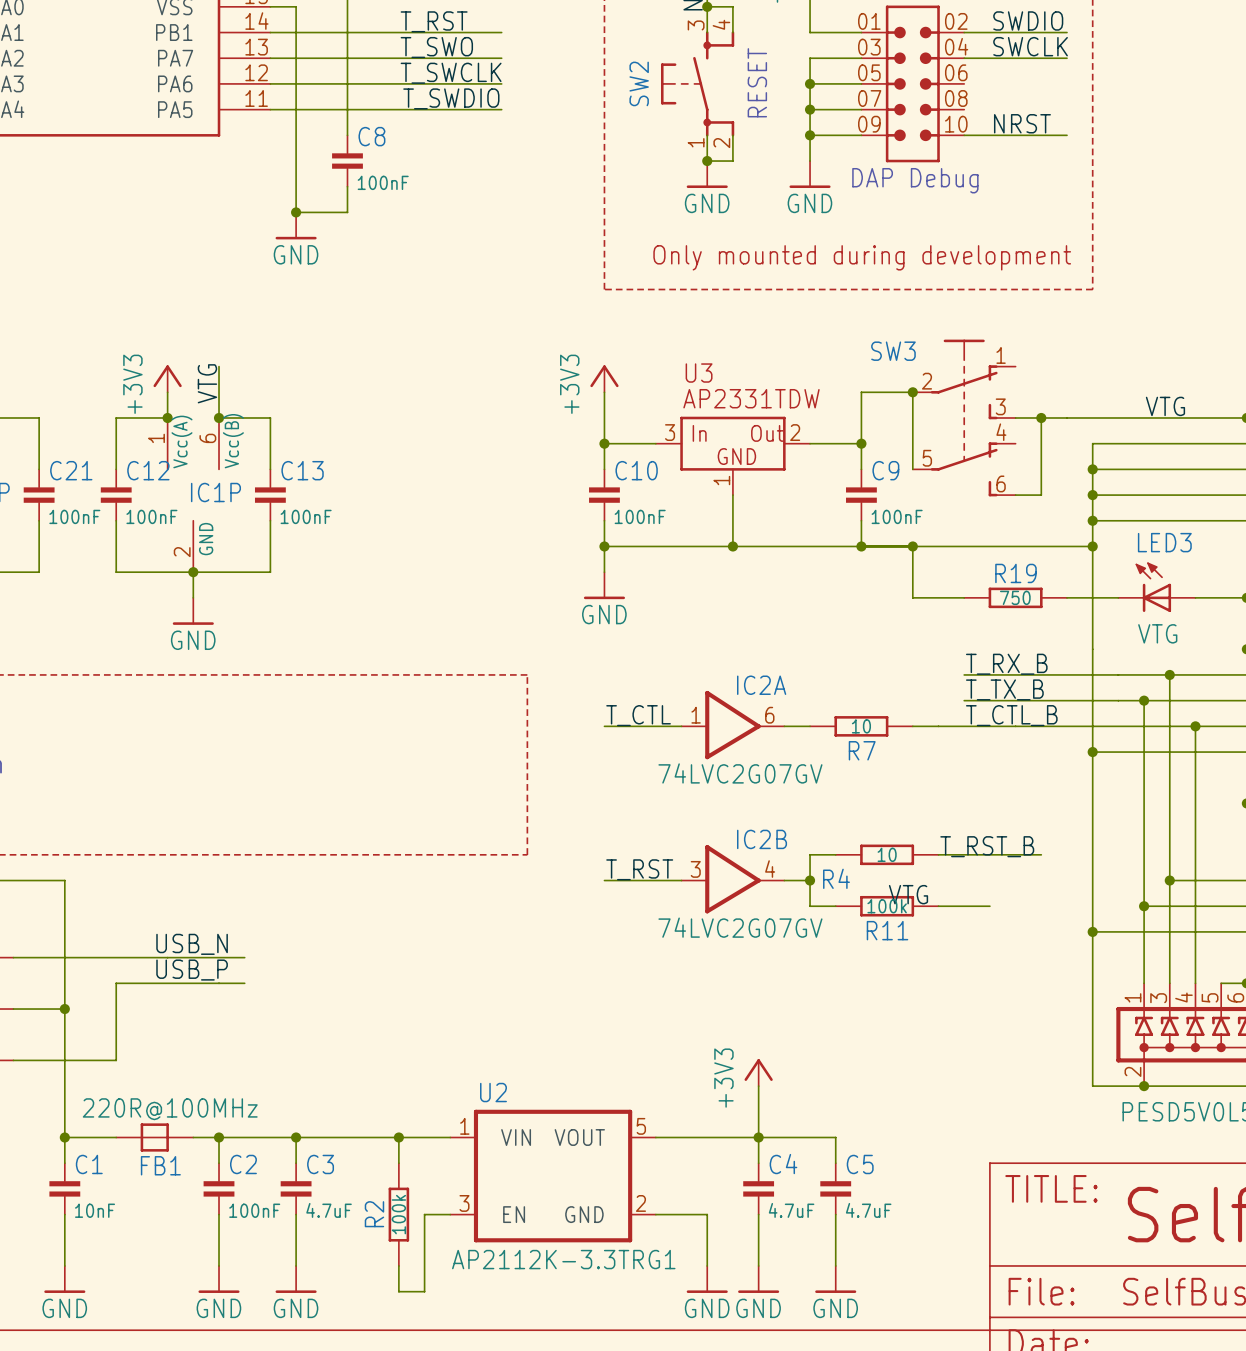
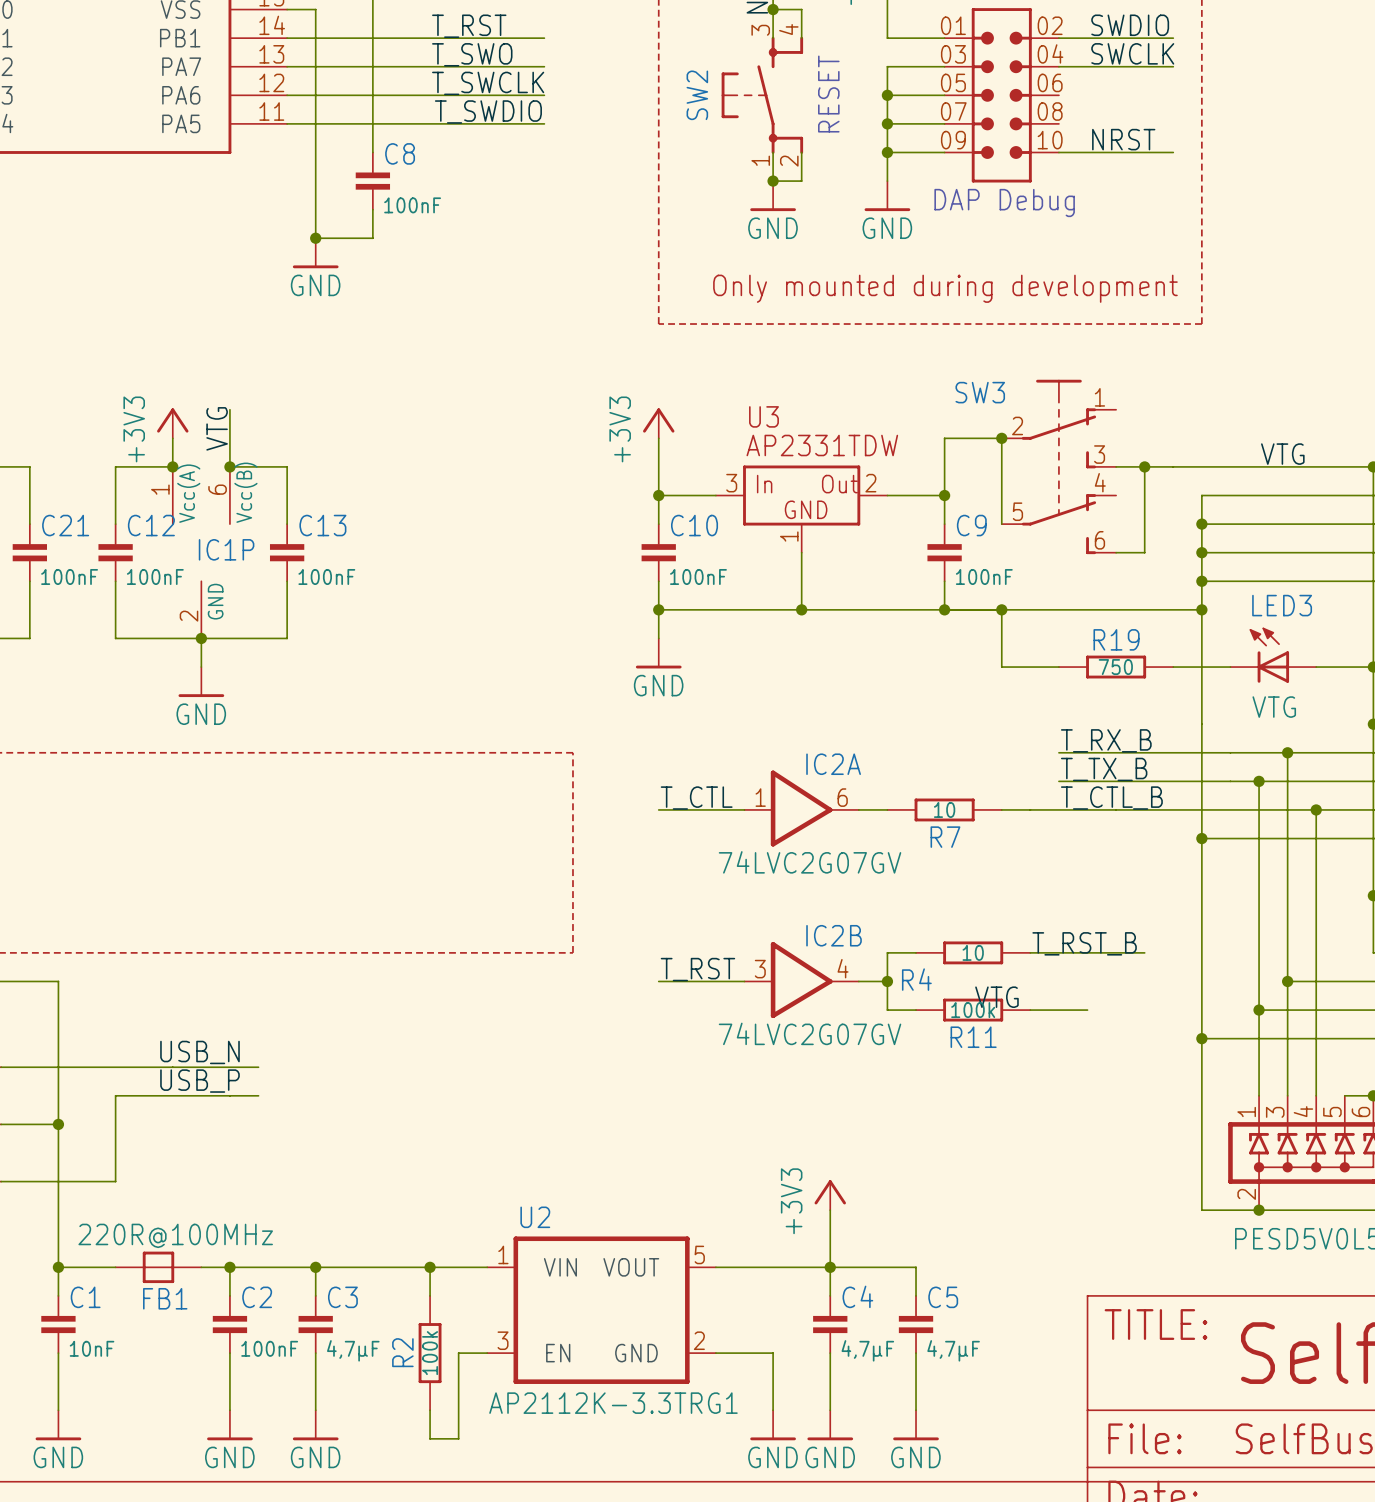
C3 value: 4.7uF (329, 1210) -> 4,7µF (353, 1350)
C4 value: 4.7uF (791, 1210) -> 4,7µF (867, 1350)
C5 value: 4.7uF (868, 1210) -> 4,7µF (953, 1350)

